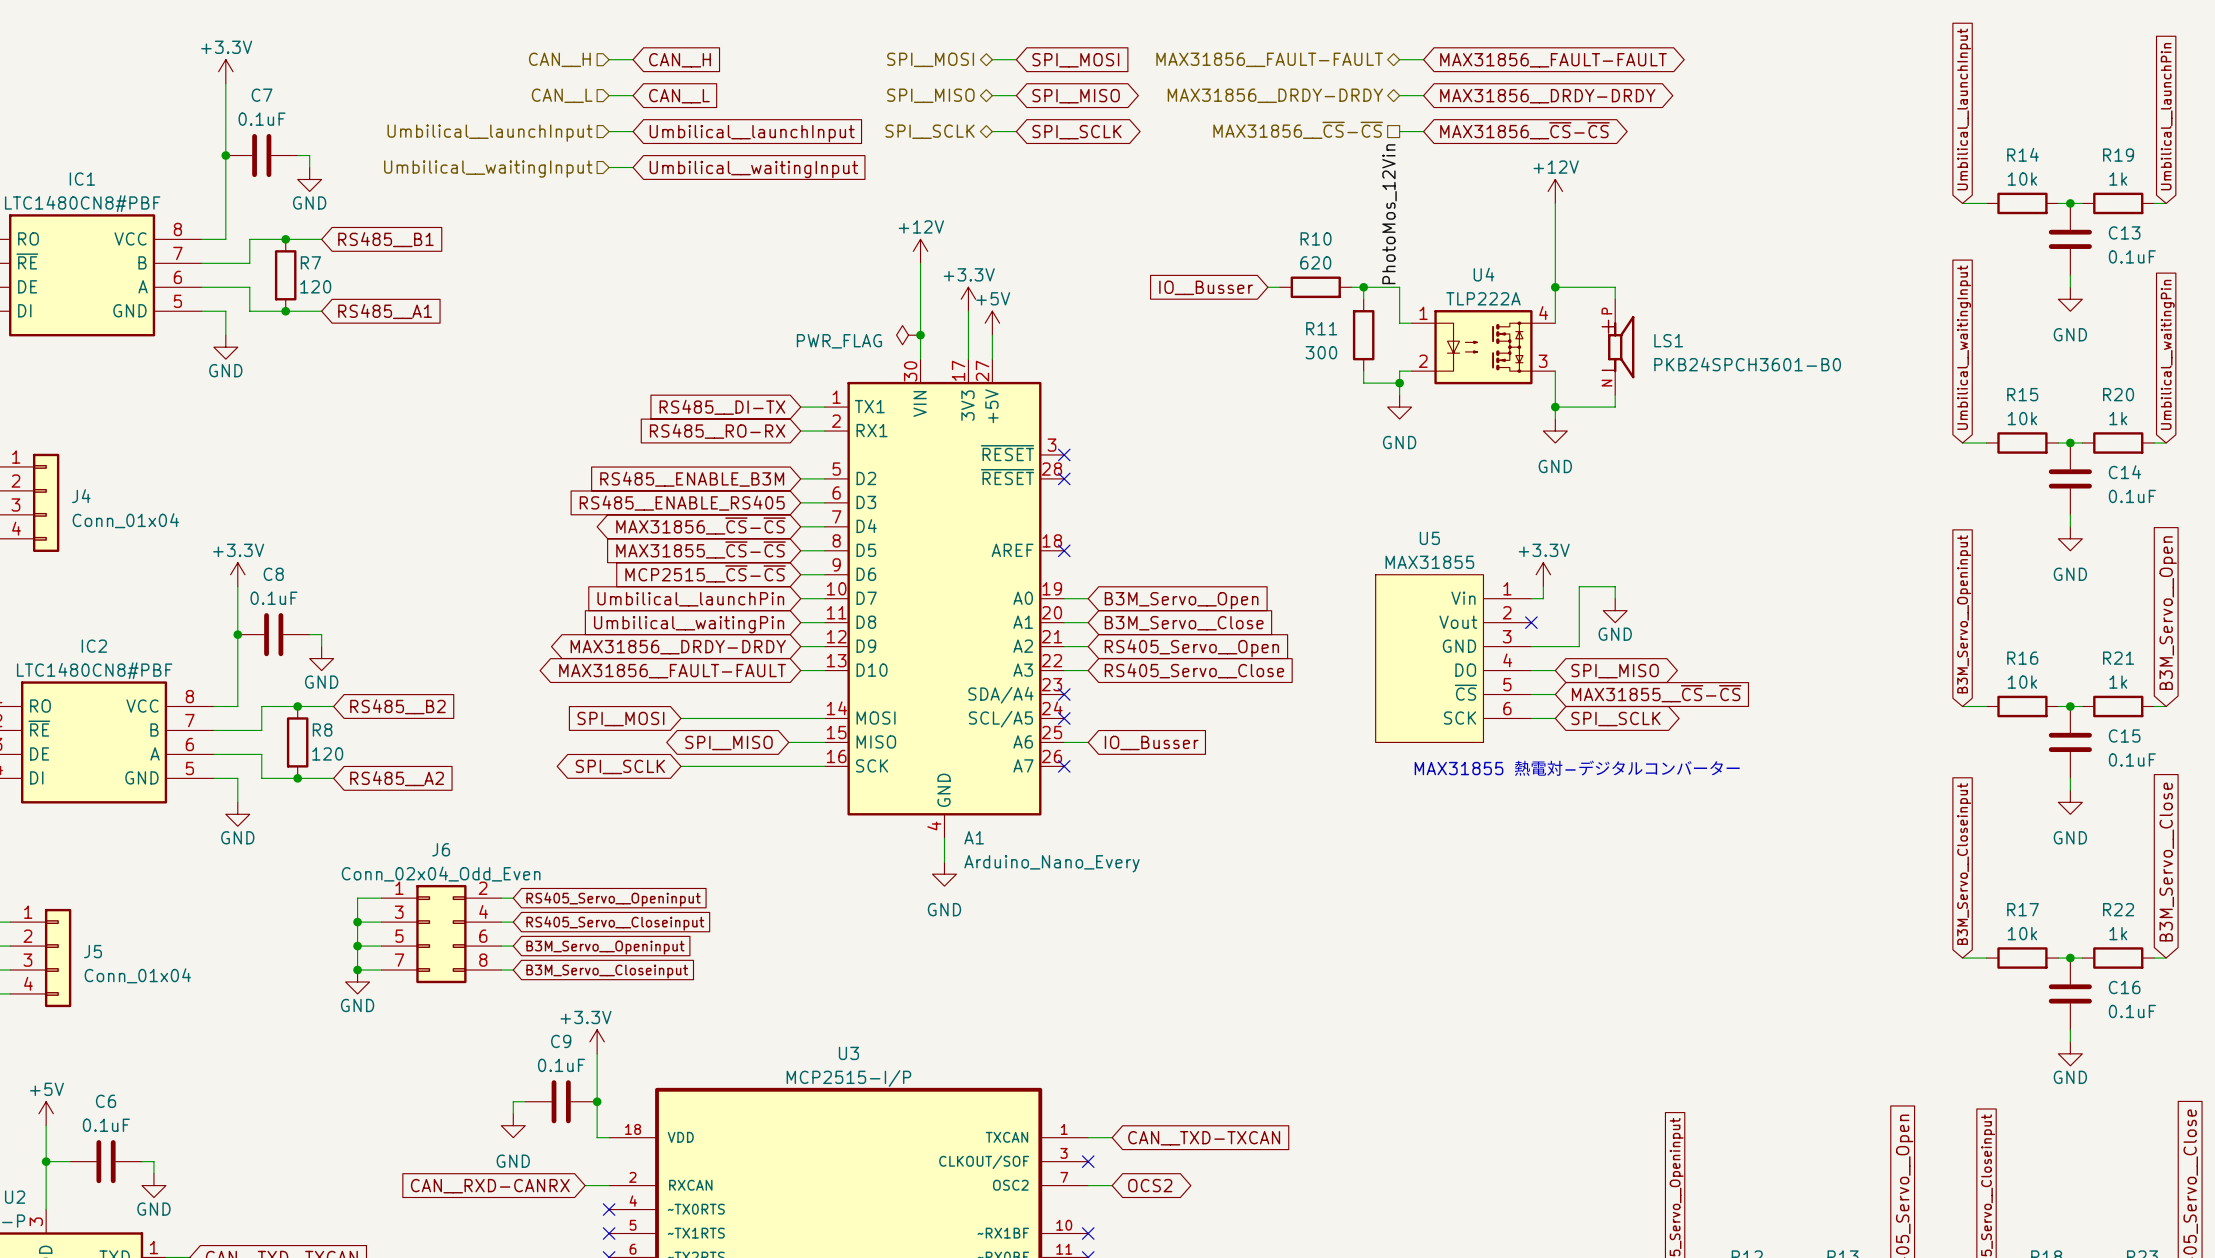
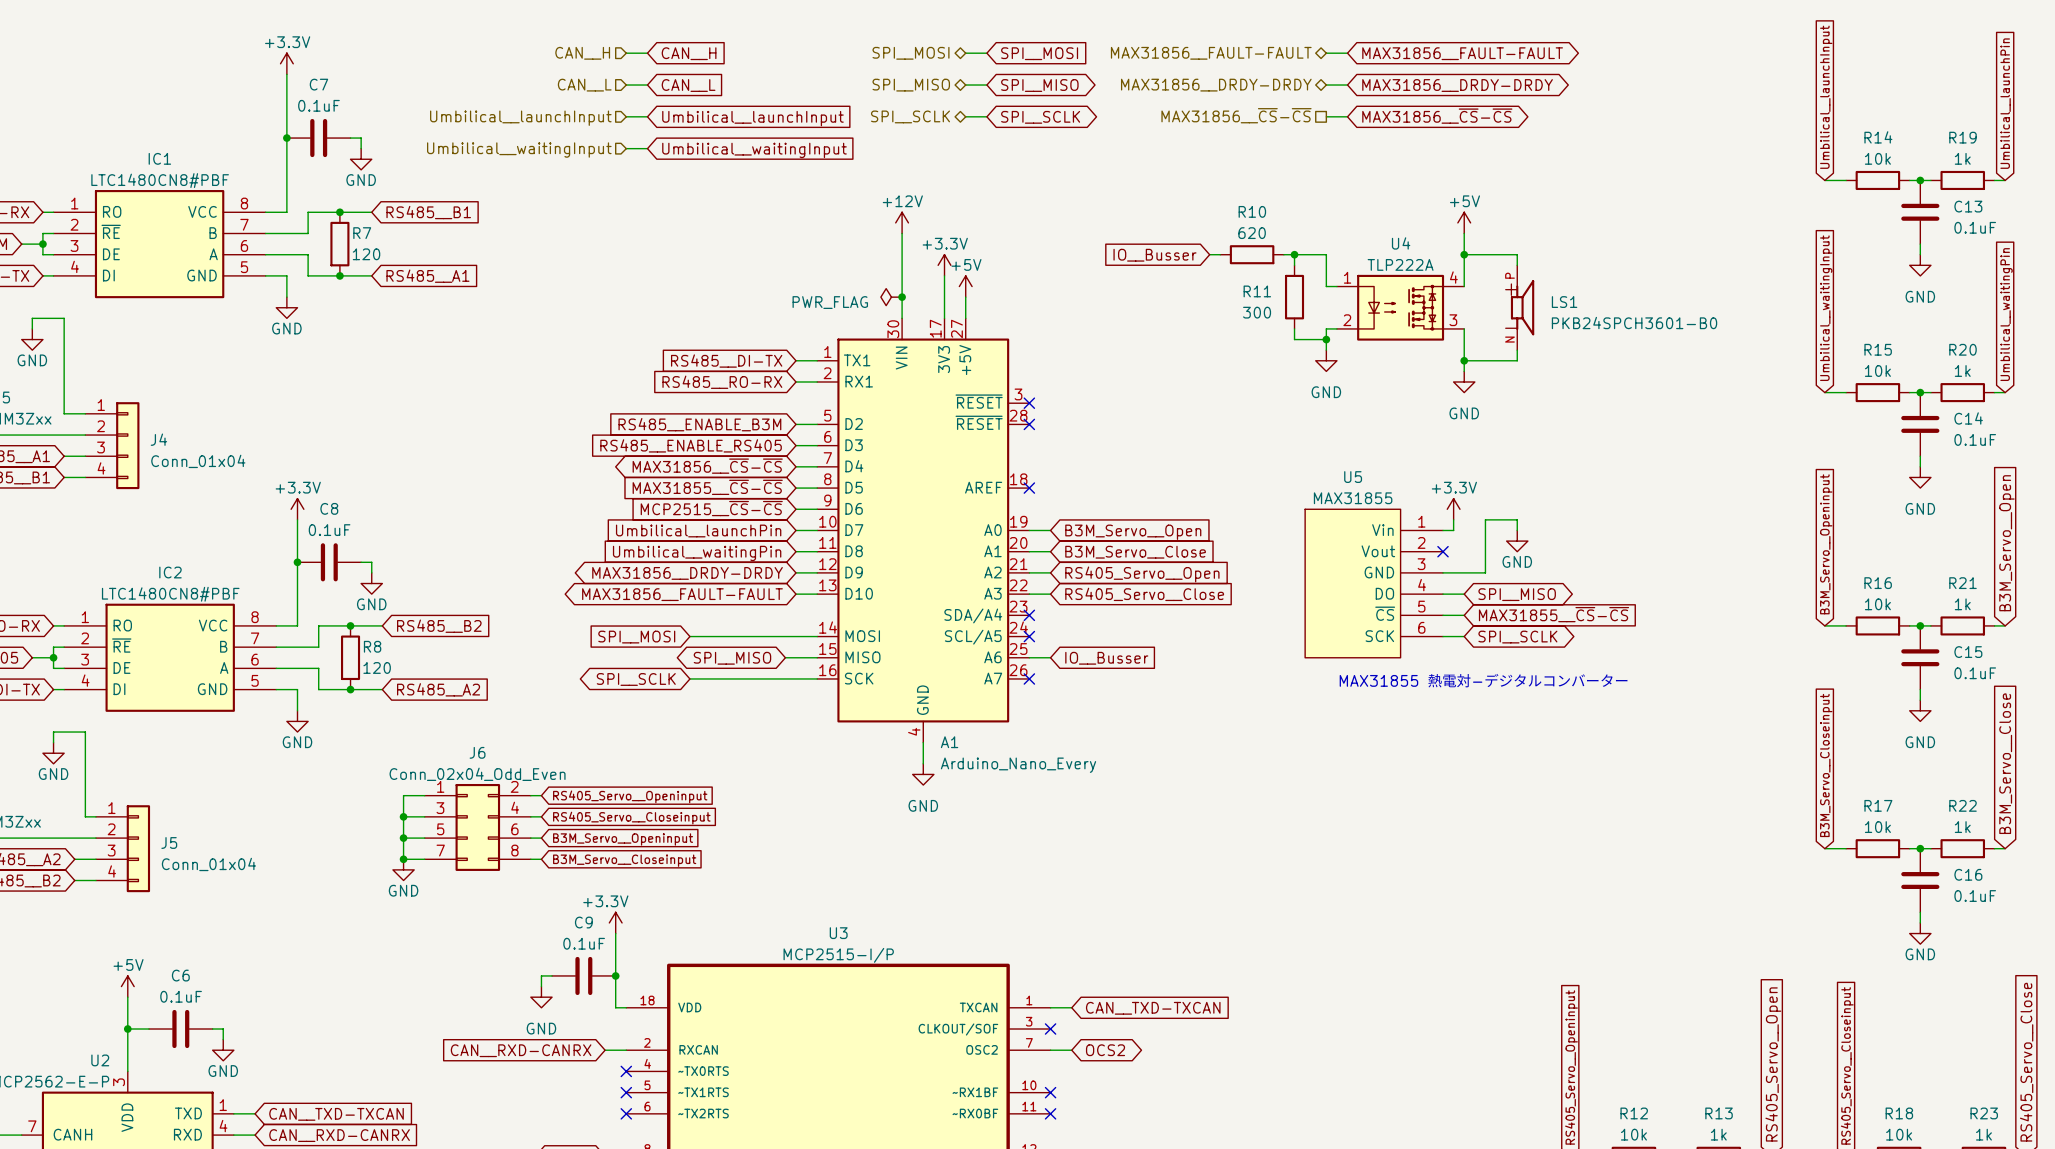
power symbol: +12V (1555, 191) -> none
wire: (1555, 203) (1555, 263) -> none
label: PhotoMos_12Vin (1389, 214) -> none
power symbol: none -> +5V (1464, 222)

